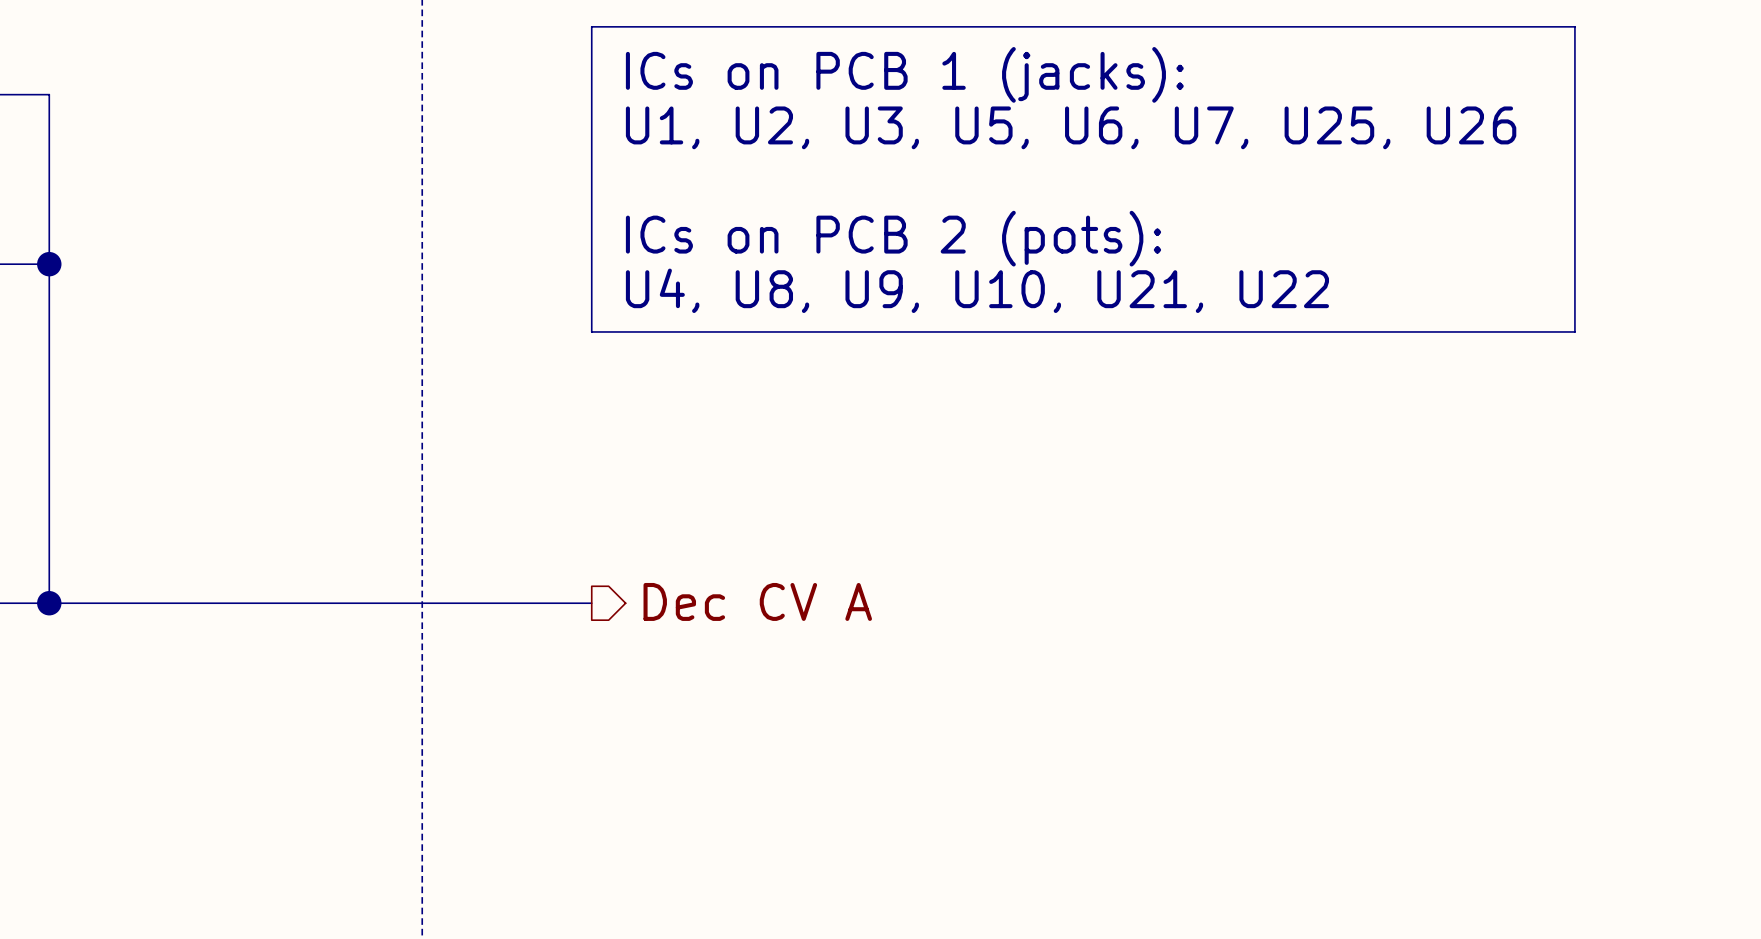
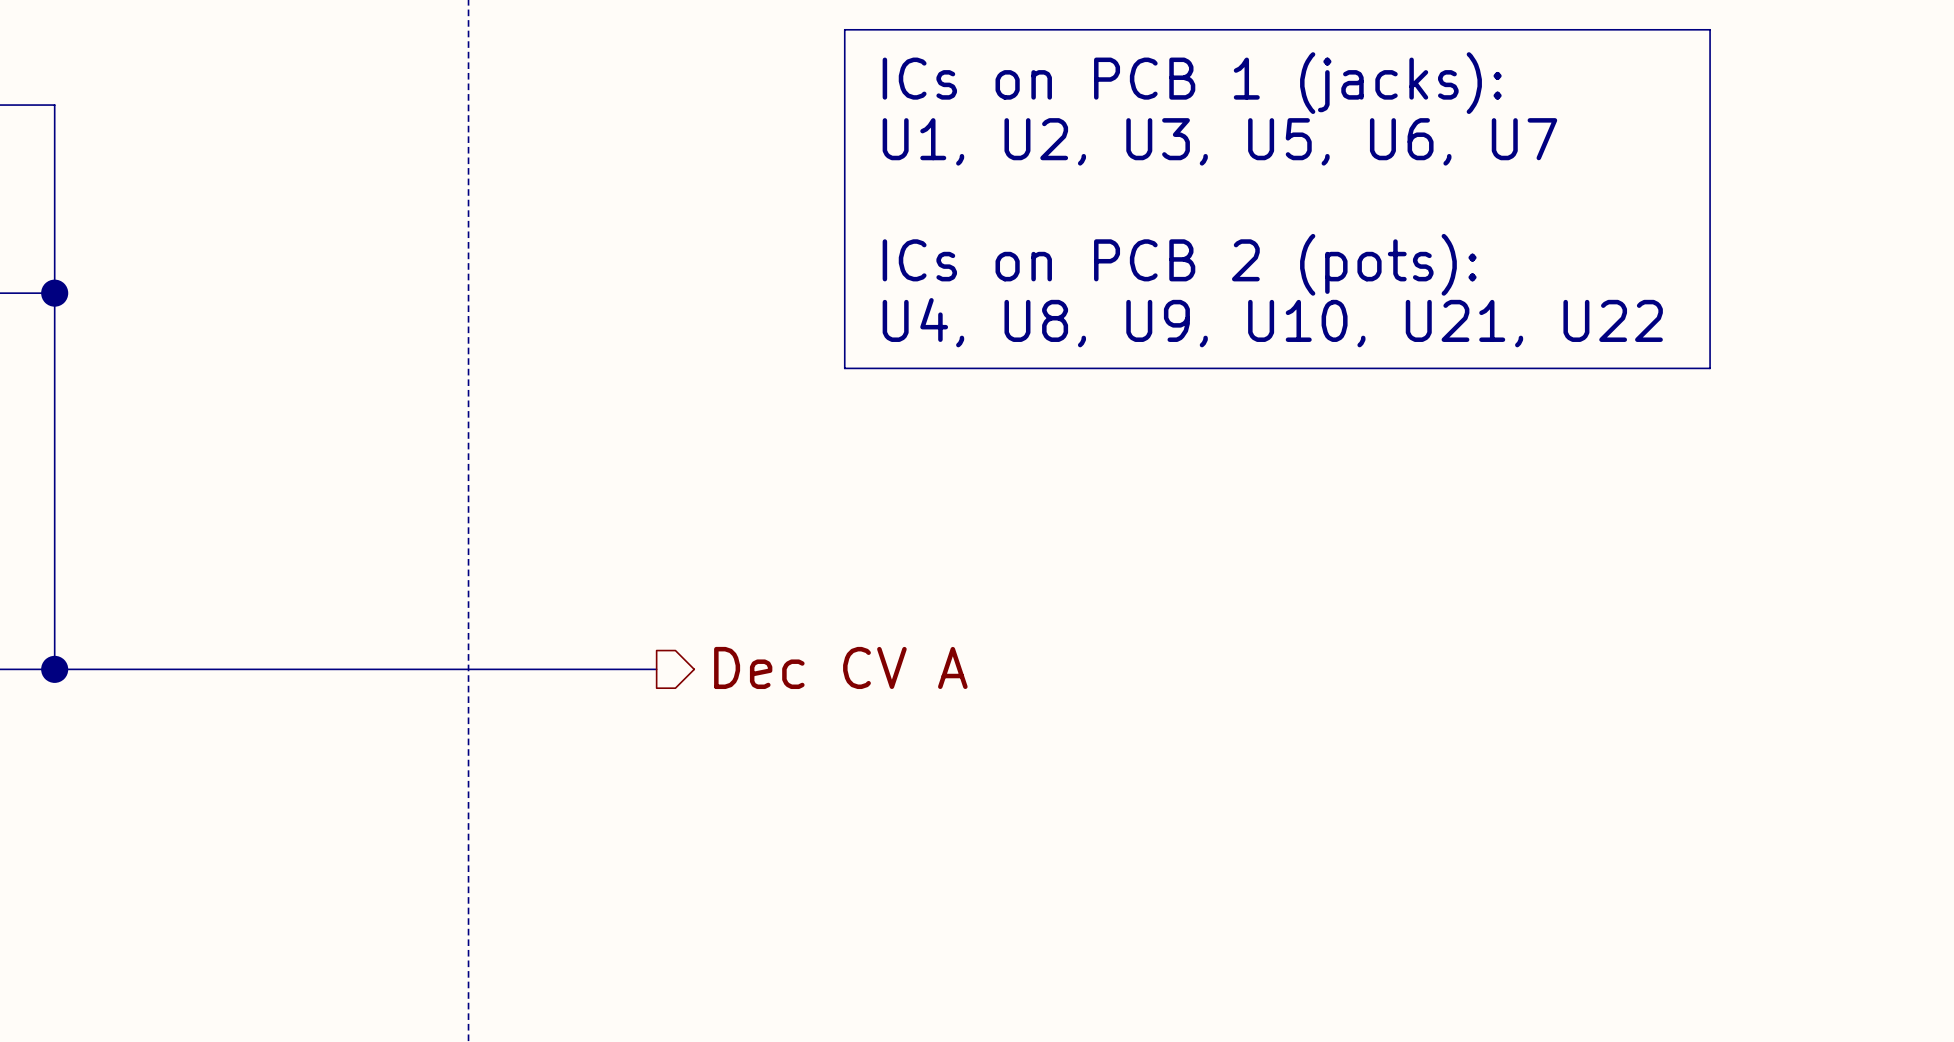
line: (761, 26) (591, 26) (591, 331) (761, 331) -> (844, 29) (844, 368)
line: (1541, 26) (1574, 26) (1574, 331) (1541, 331) -> (1710, 29) (1710, 368)
text position: ICs on PCB 1 (jacks): (904, 74) -> ICs on PCB 1 (jacks): (1192, 83)
text: U1, U2, U3, U5, U6, U7, U25, U26 (1071, 127) -> U1, U2, U3, U5, U6, U7 (1219, 141)
text position: ICs on PCB 2 (pots): (893, 238) -> ICs on PCB 2 (pots): (1179, 264)
text position: U4, U8, U9, U10, U21, U22 (977, 290) -> U4, U8, U9, U10, U21, U22 (1272, 322)

